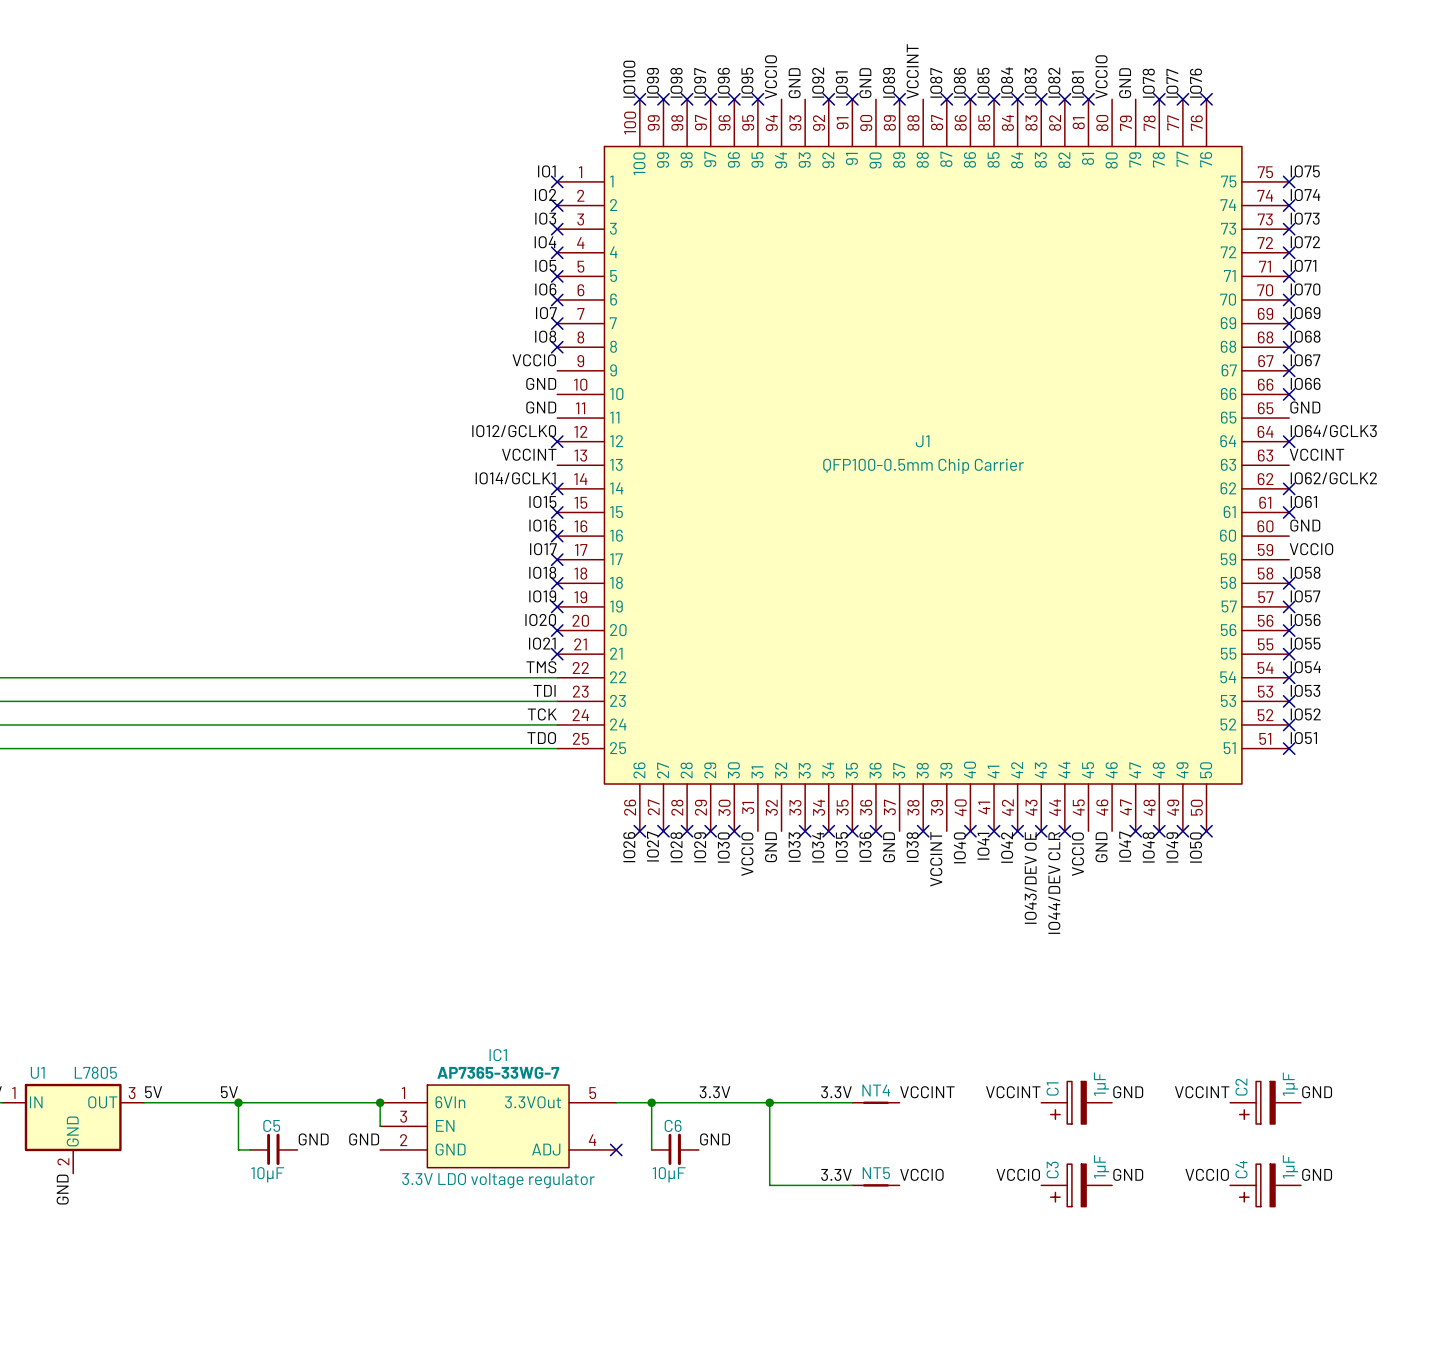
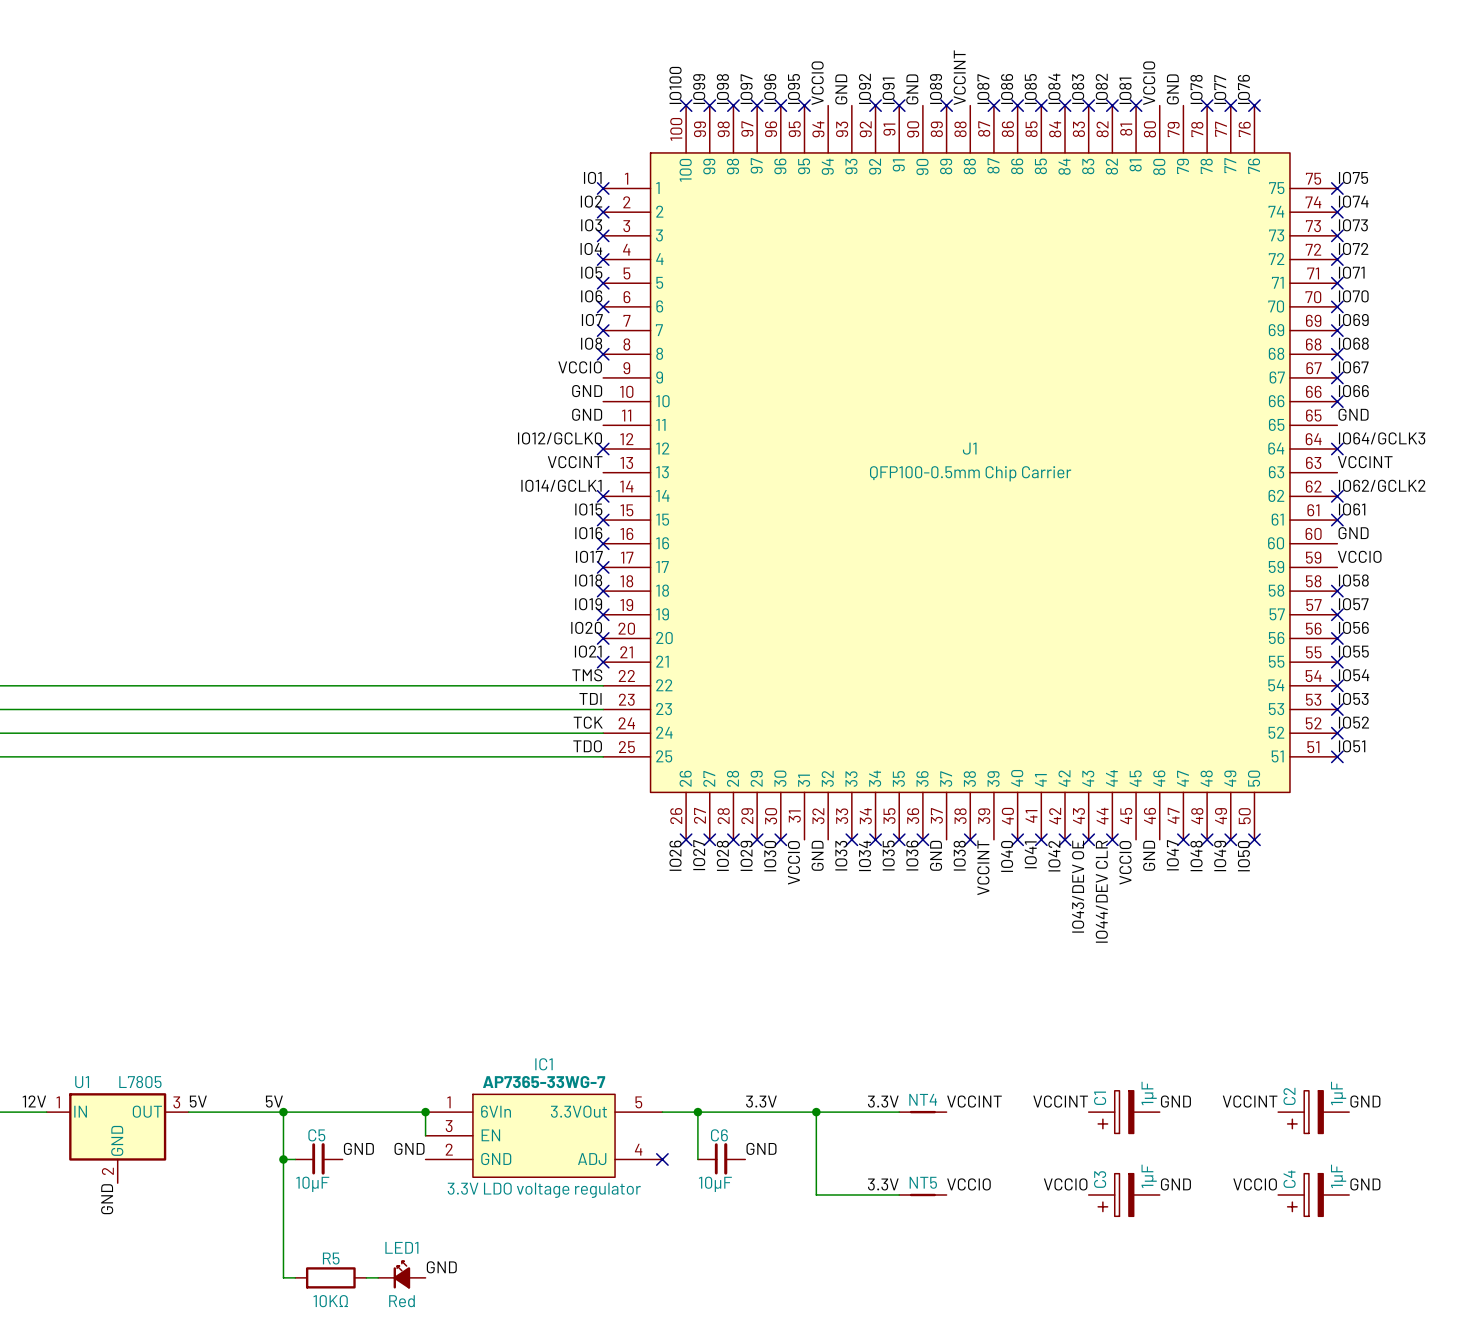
wire: none -> (283, 1159) (283, 1277) (295, 1277)
junction: none -> (283, 1159)
label: none -> GND (441, 1267)
LED1: none -> Red (401, 1274)
R5: none -> 10KΩ (330, 1277)
wire: none -> (366, 1277) (378, 1277)

